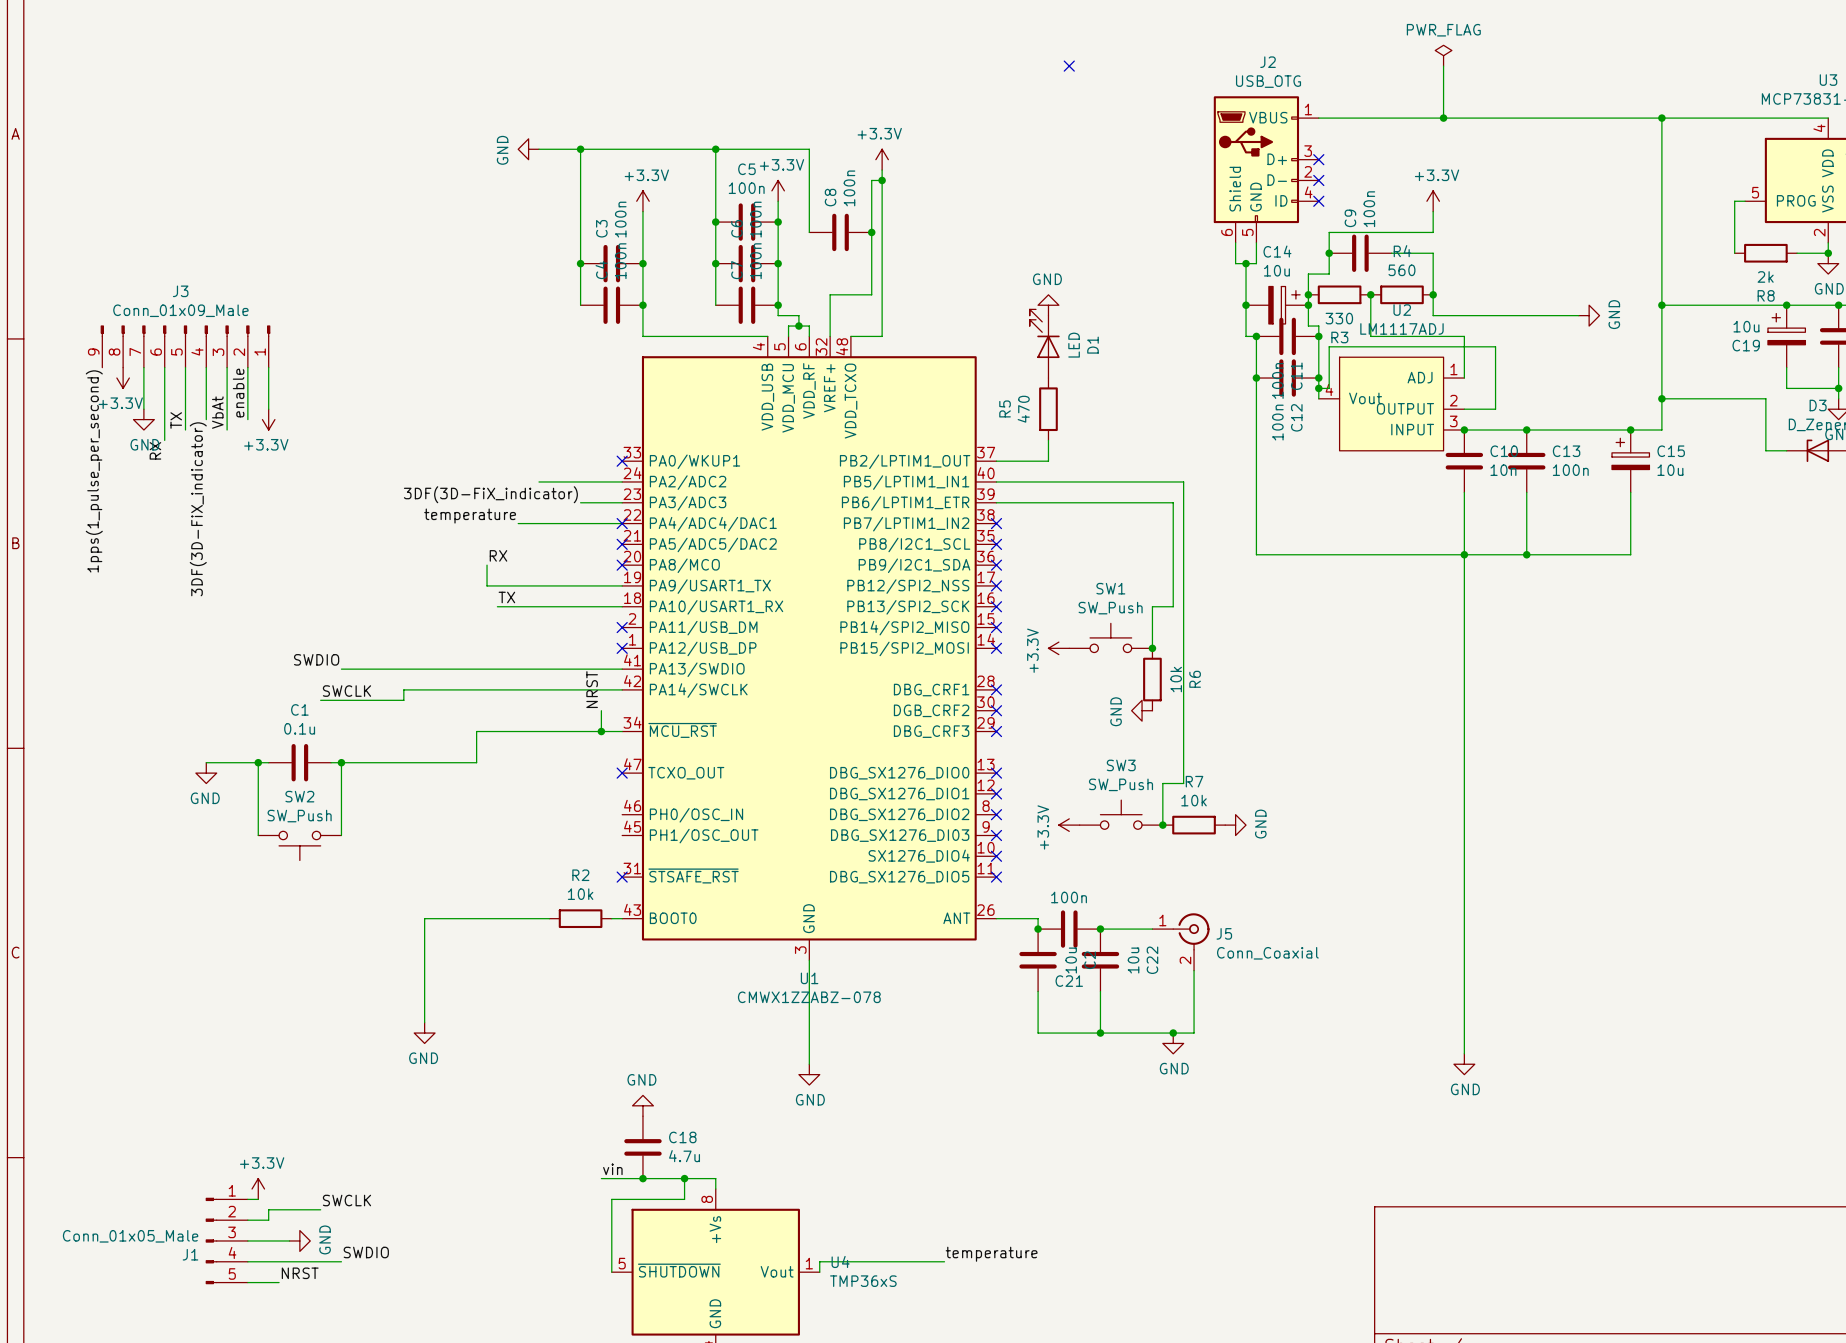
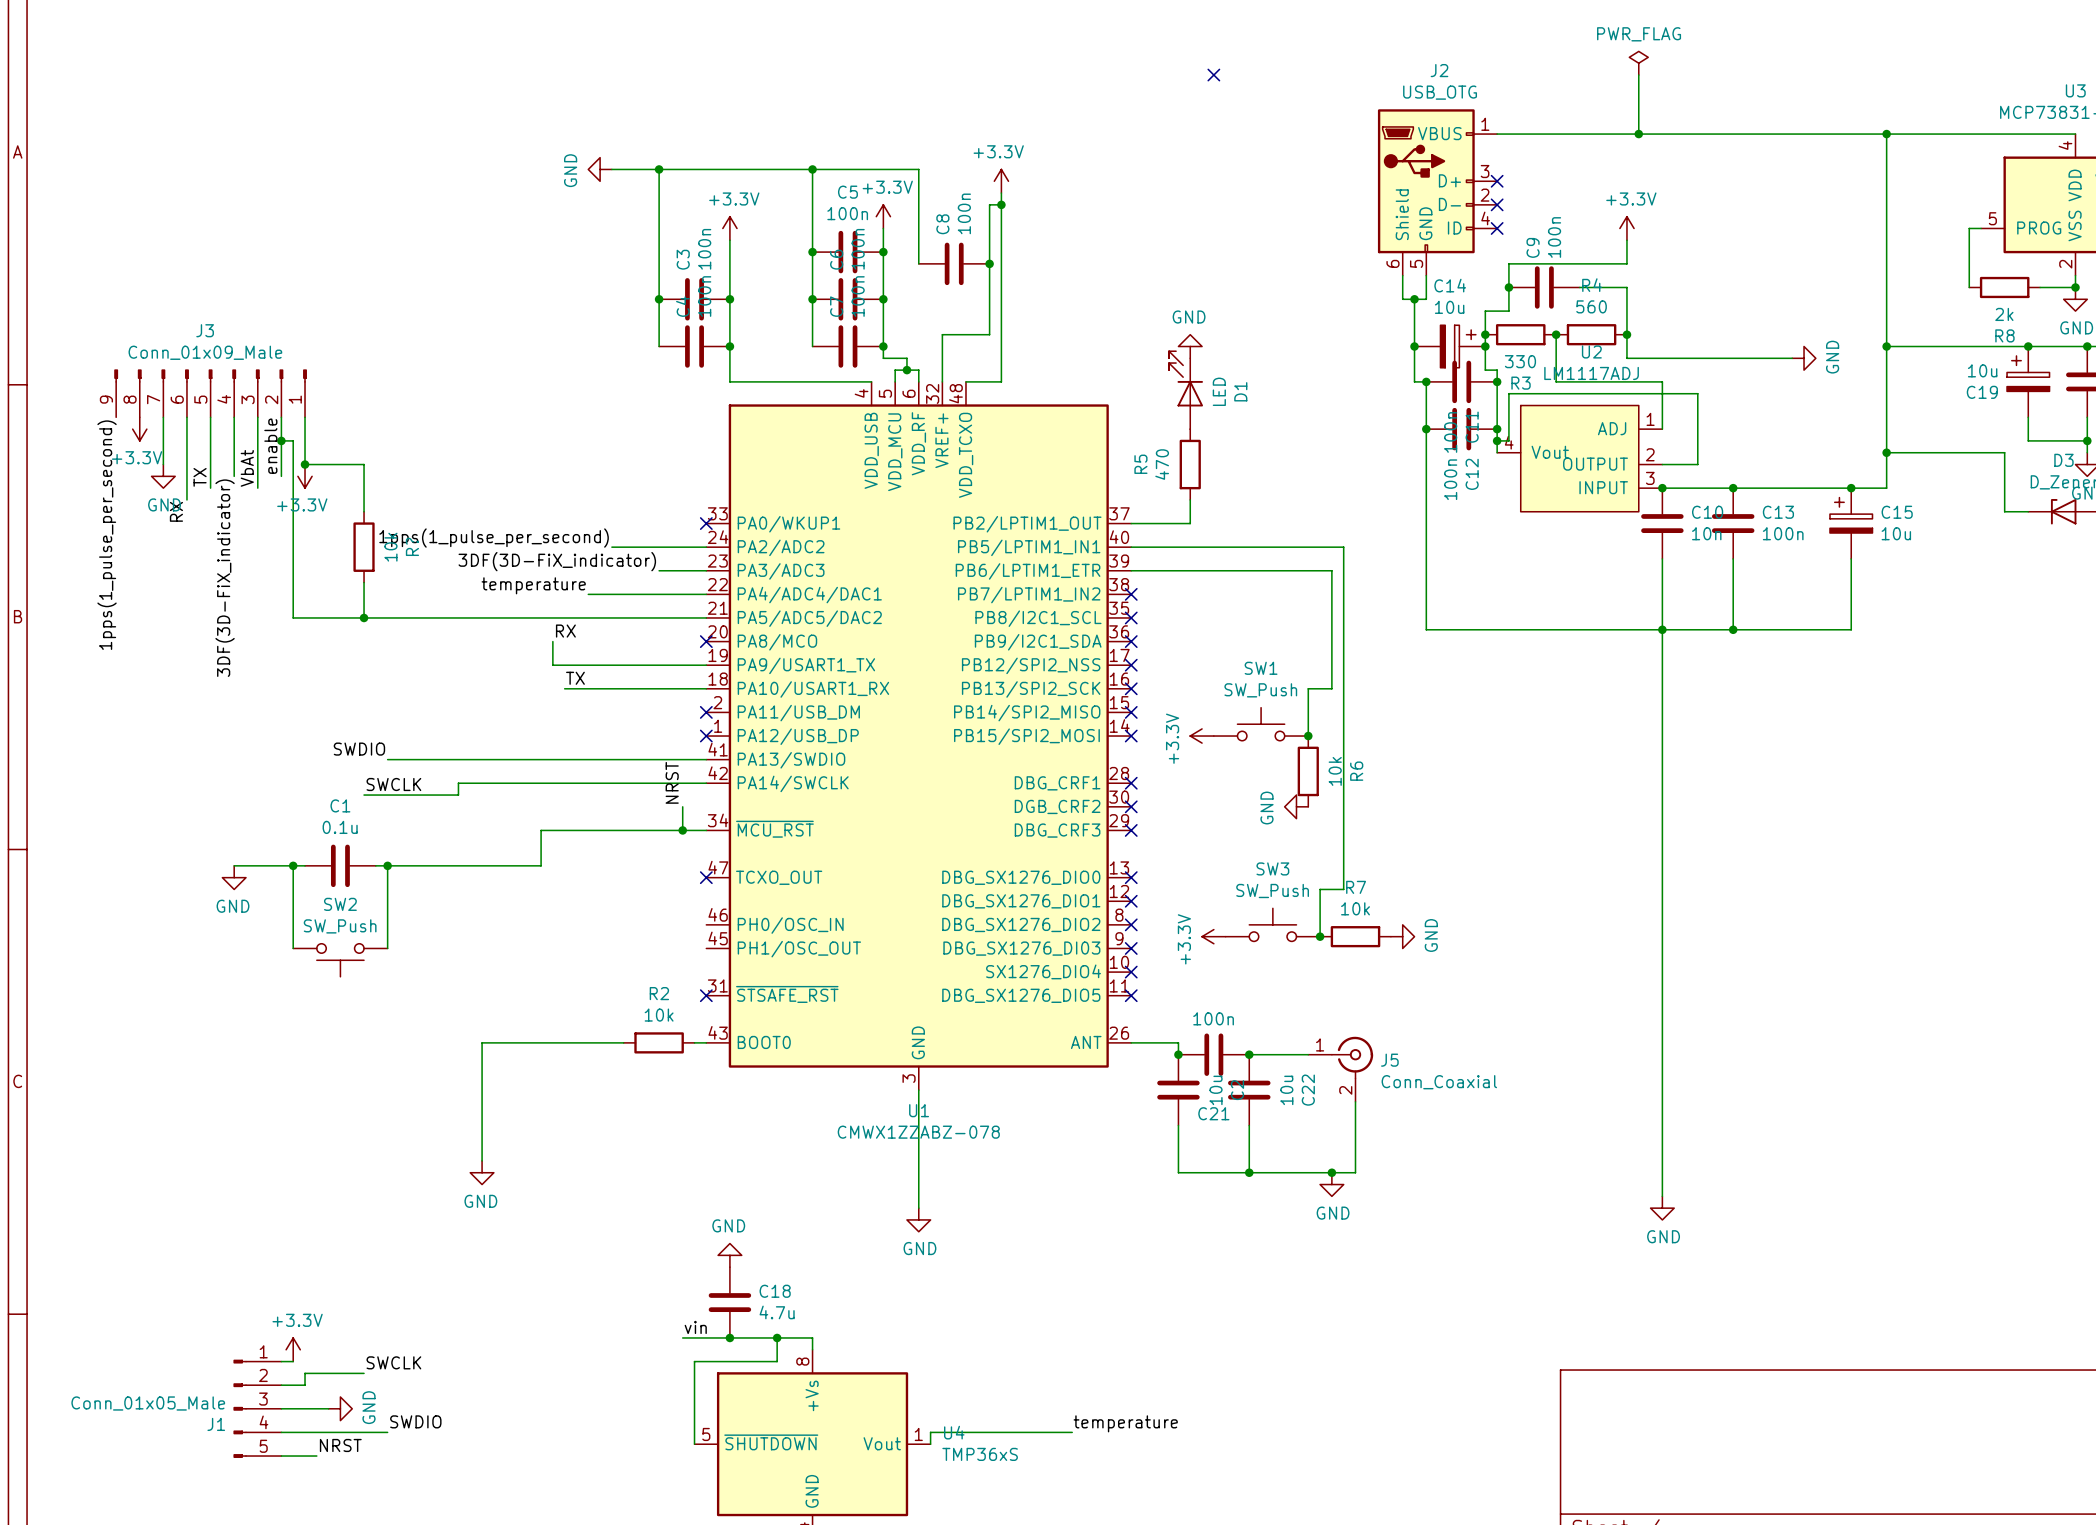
wire: none -> (281, 440) (293, 440) (293, 617) (706, 617)
junction: none -> (281, 440)
wire: none -> (305, 464) (364, 464) (364, 511)
junction: none -> (305, 464)
label: none -> 1pps(1_pulse_per_second) (494, 538)
R?: none -> 10k (364, 547)
wire: none -> (364, 582) (364, 617)
no-connect mark: (622, 523) -> none
junction: none -> (364, 617)
no-connect mark: (622, 544) -> none

